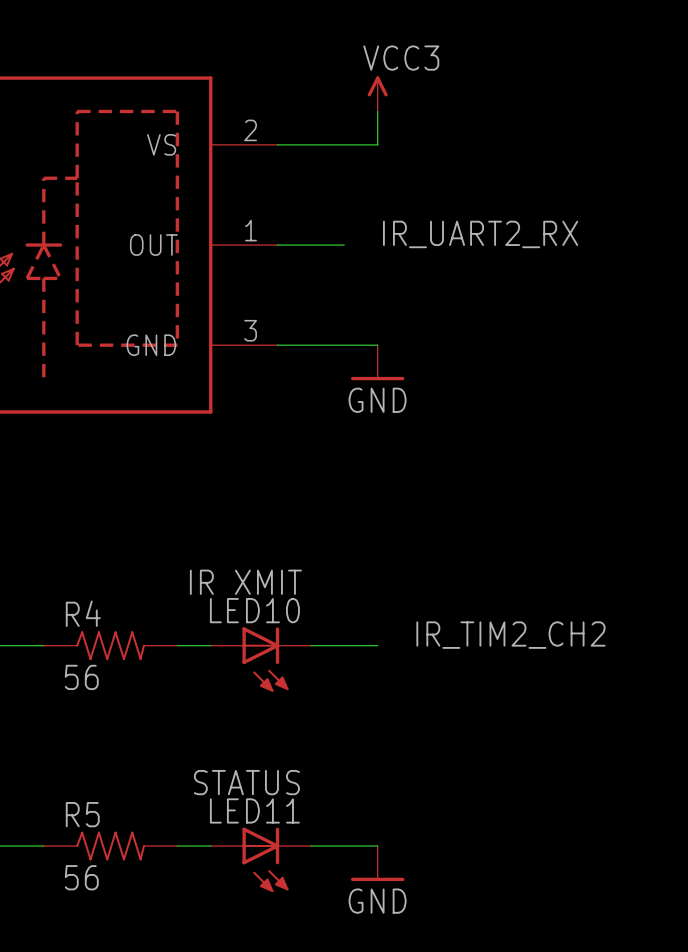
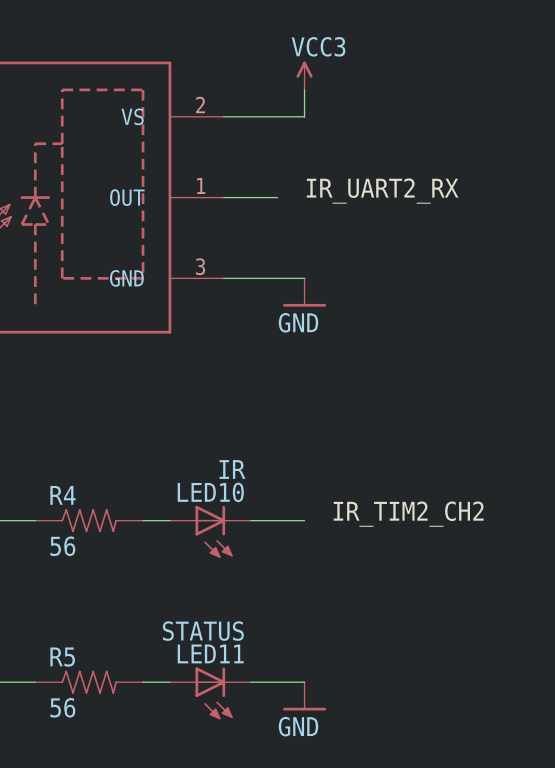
LED10 value: IR XMIT (245, 582) -> IR (232, 469)

